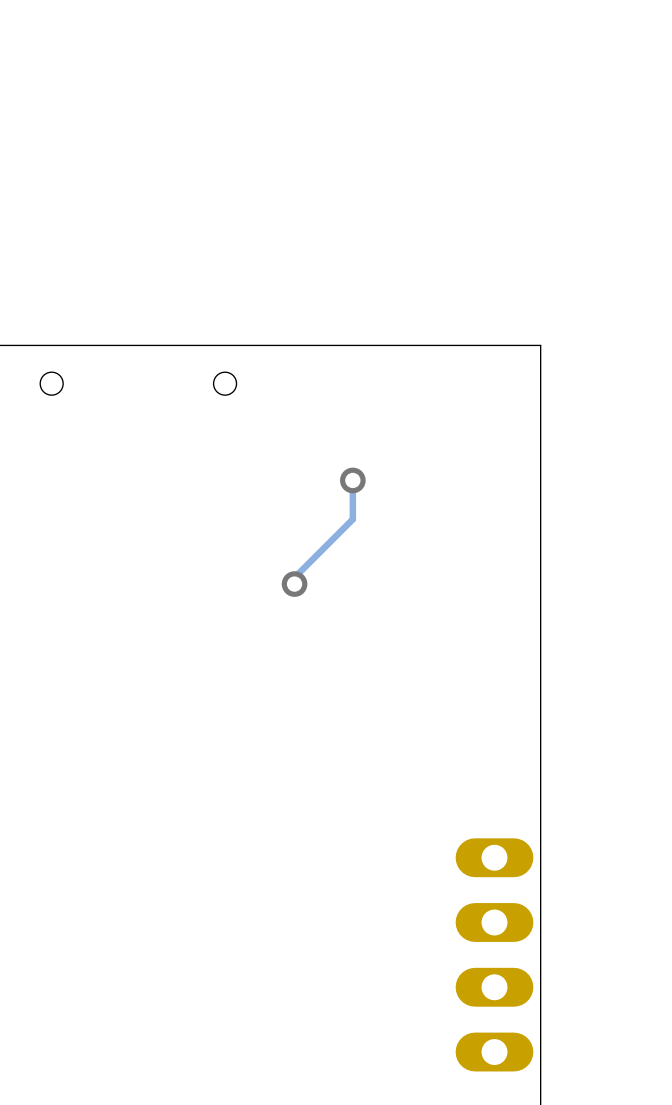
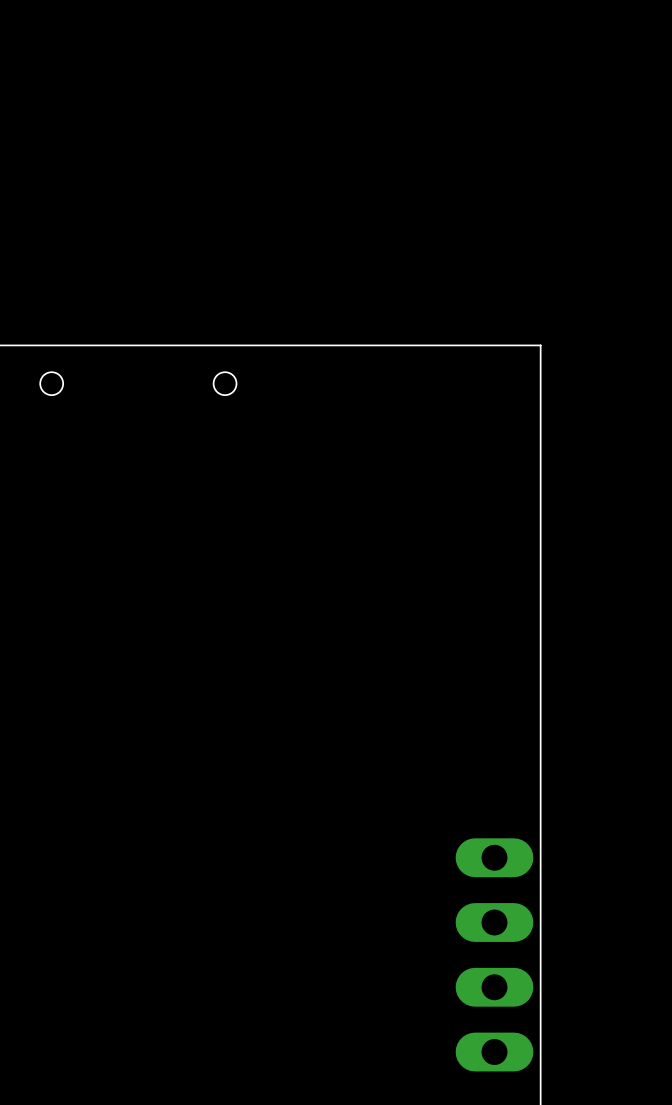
track: (352, 480) (352, 519) (294, 577) (294, 584) -> none
via: (352, 480) -> none
via: (294, 584) -> none

